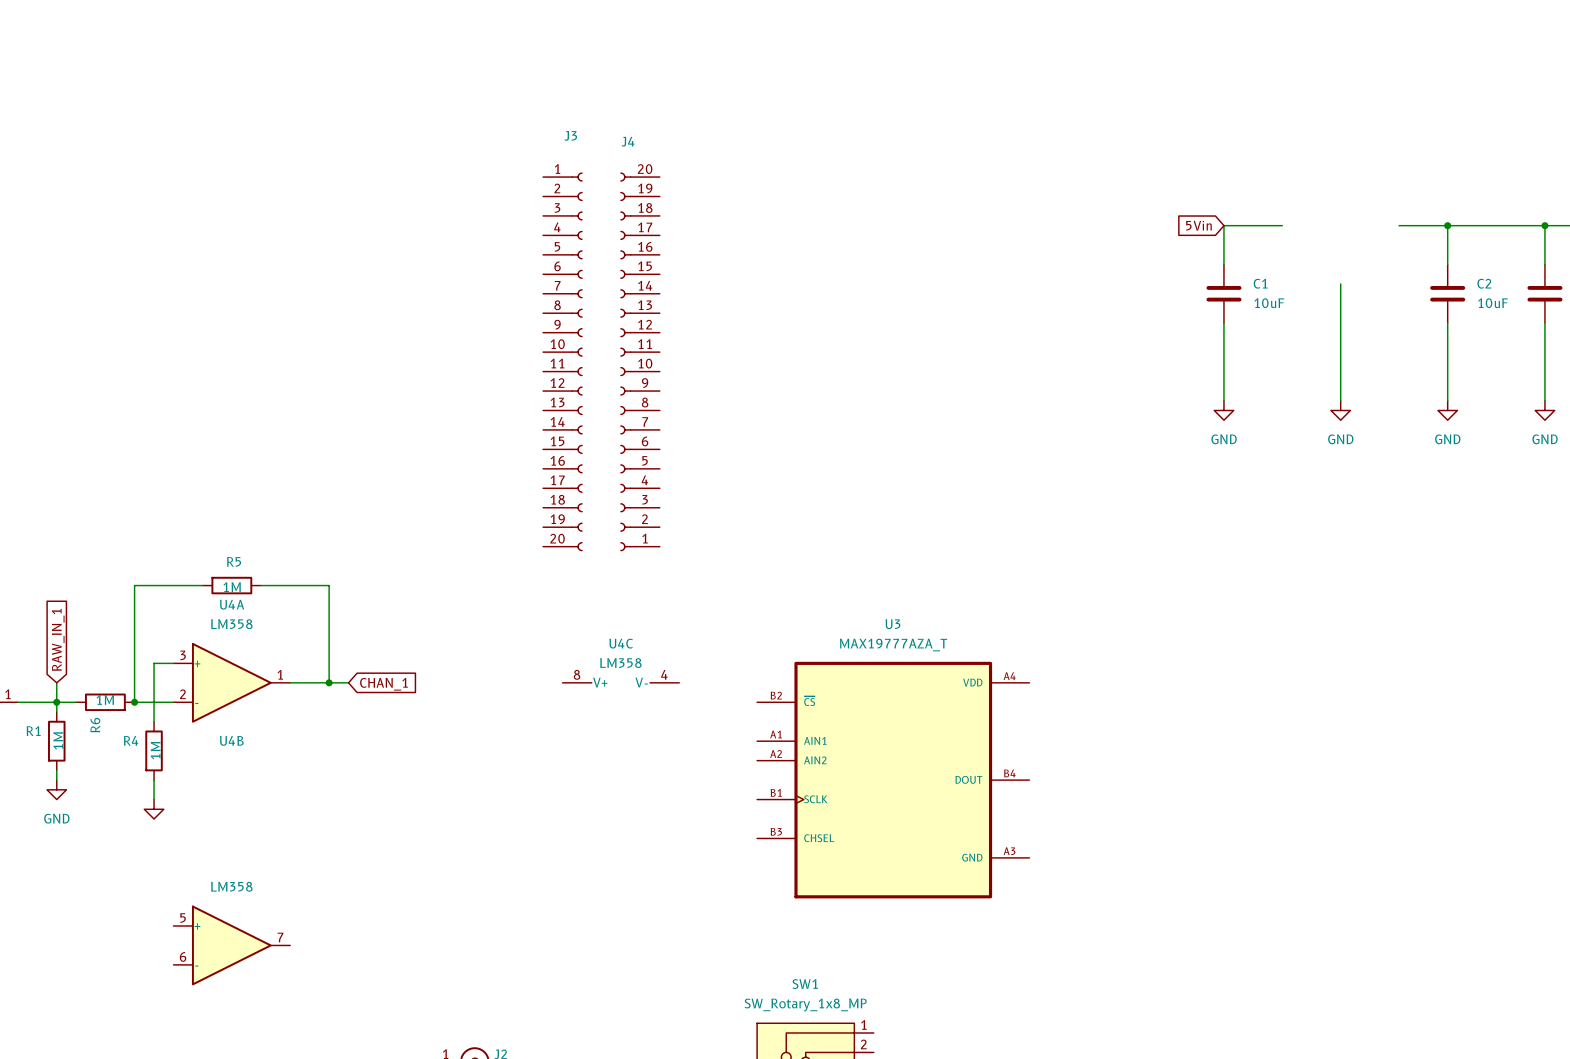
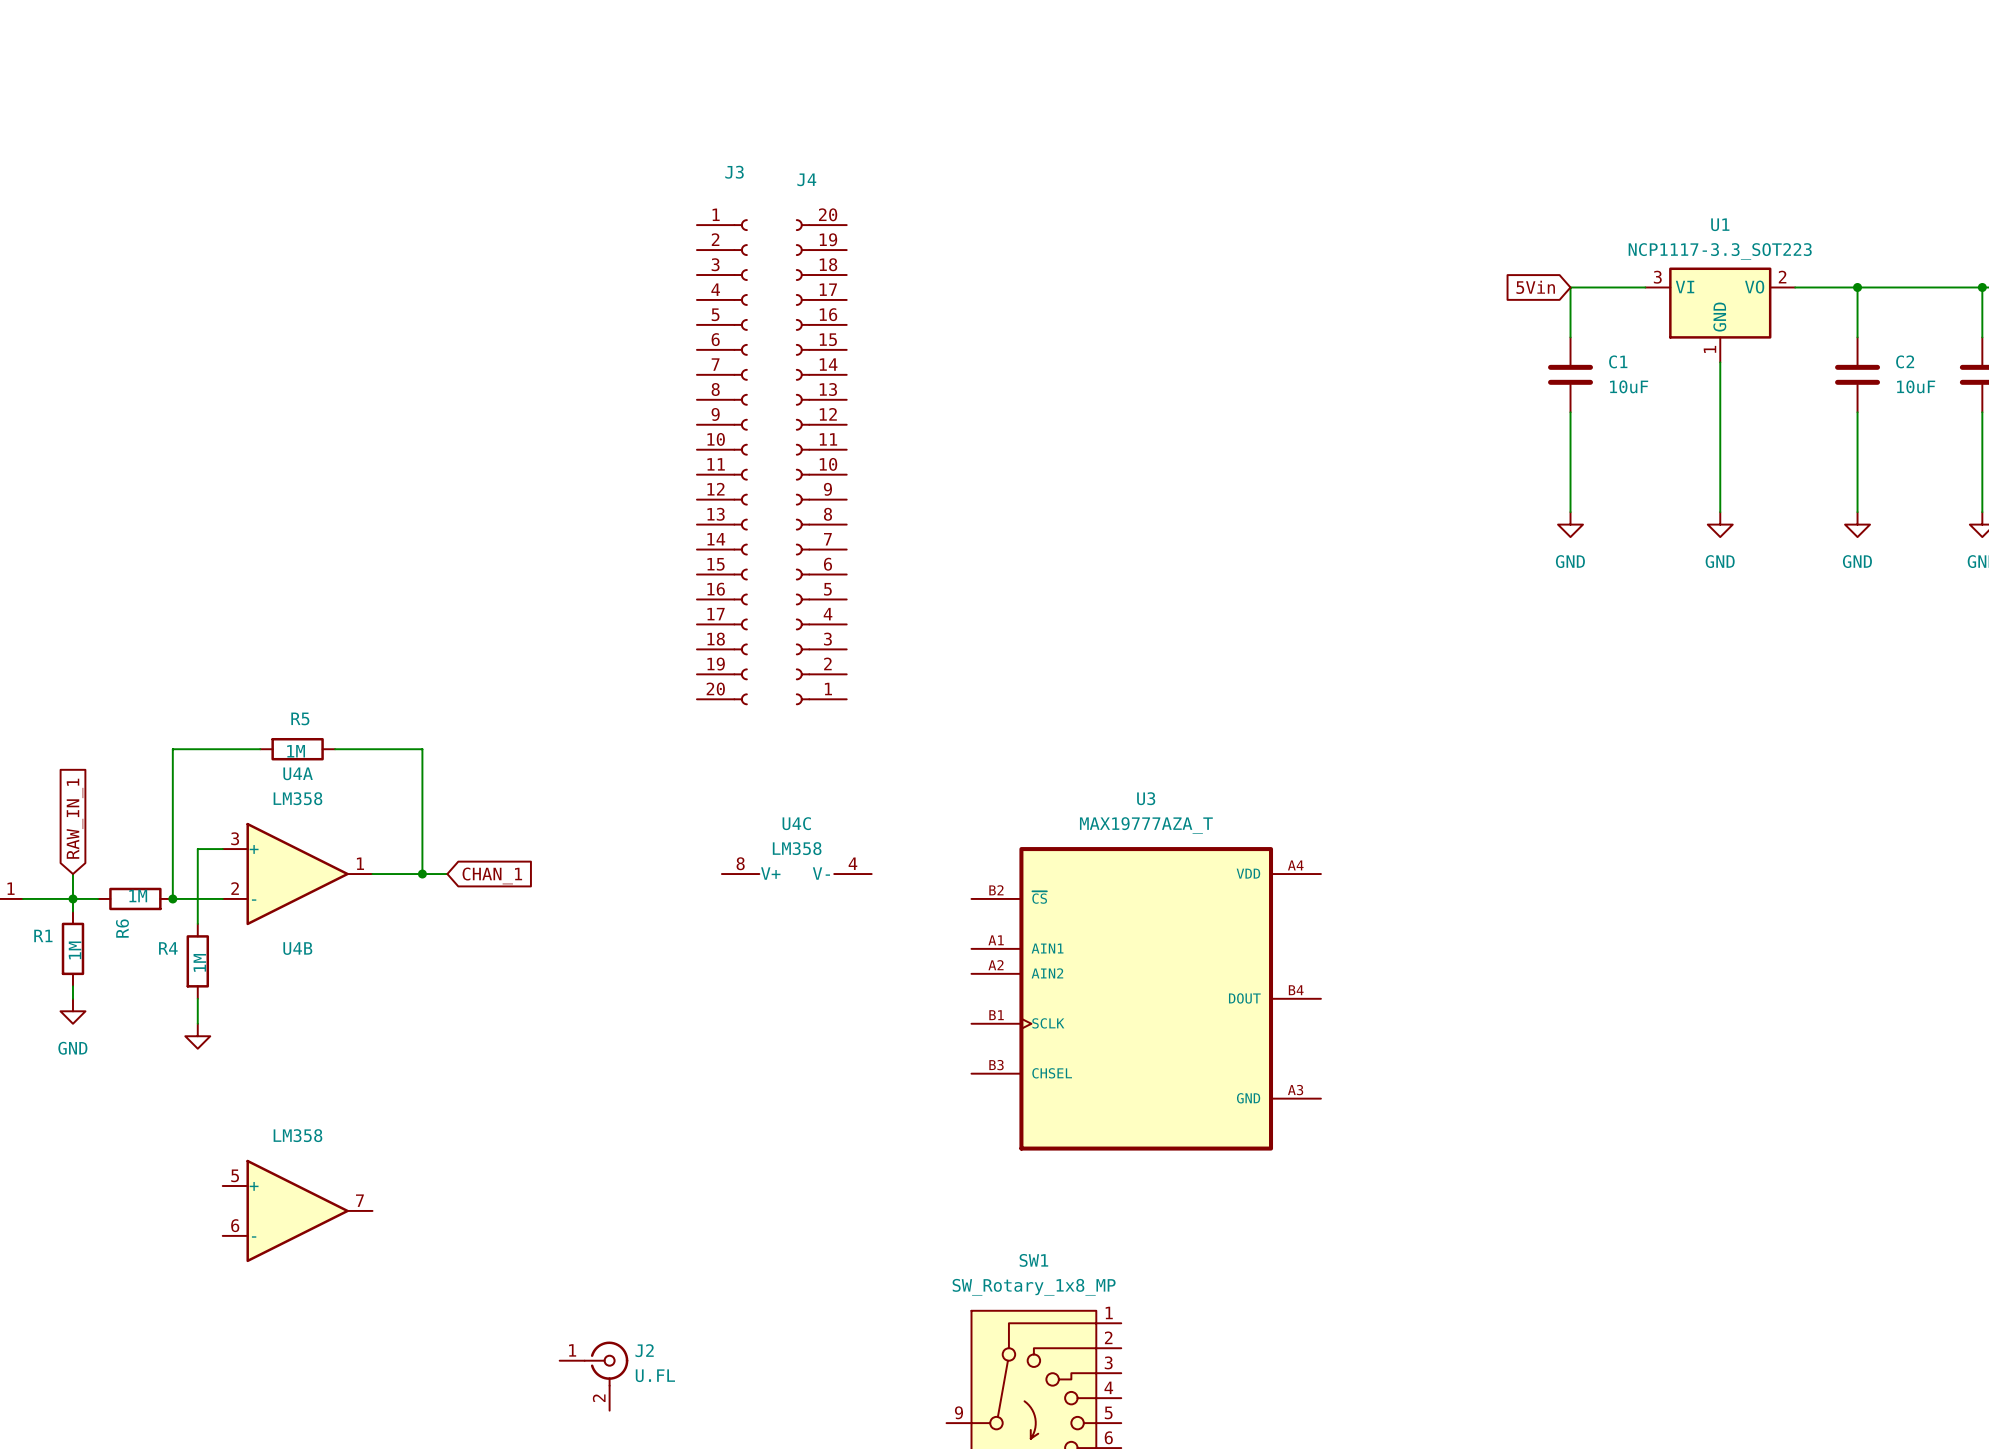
U1: none -> NCP1117-3.3_SOT223 (1720, 314)

